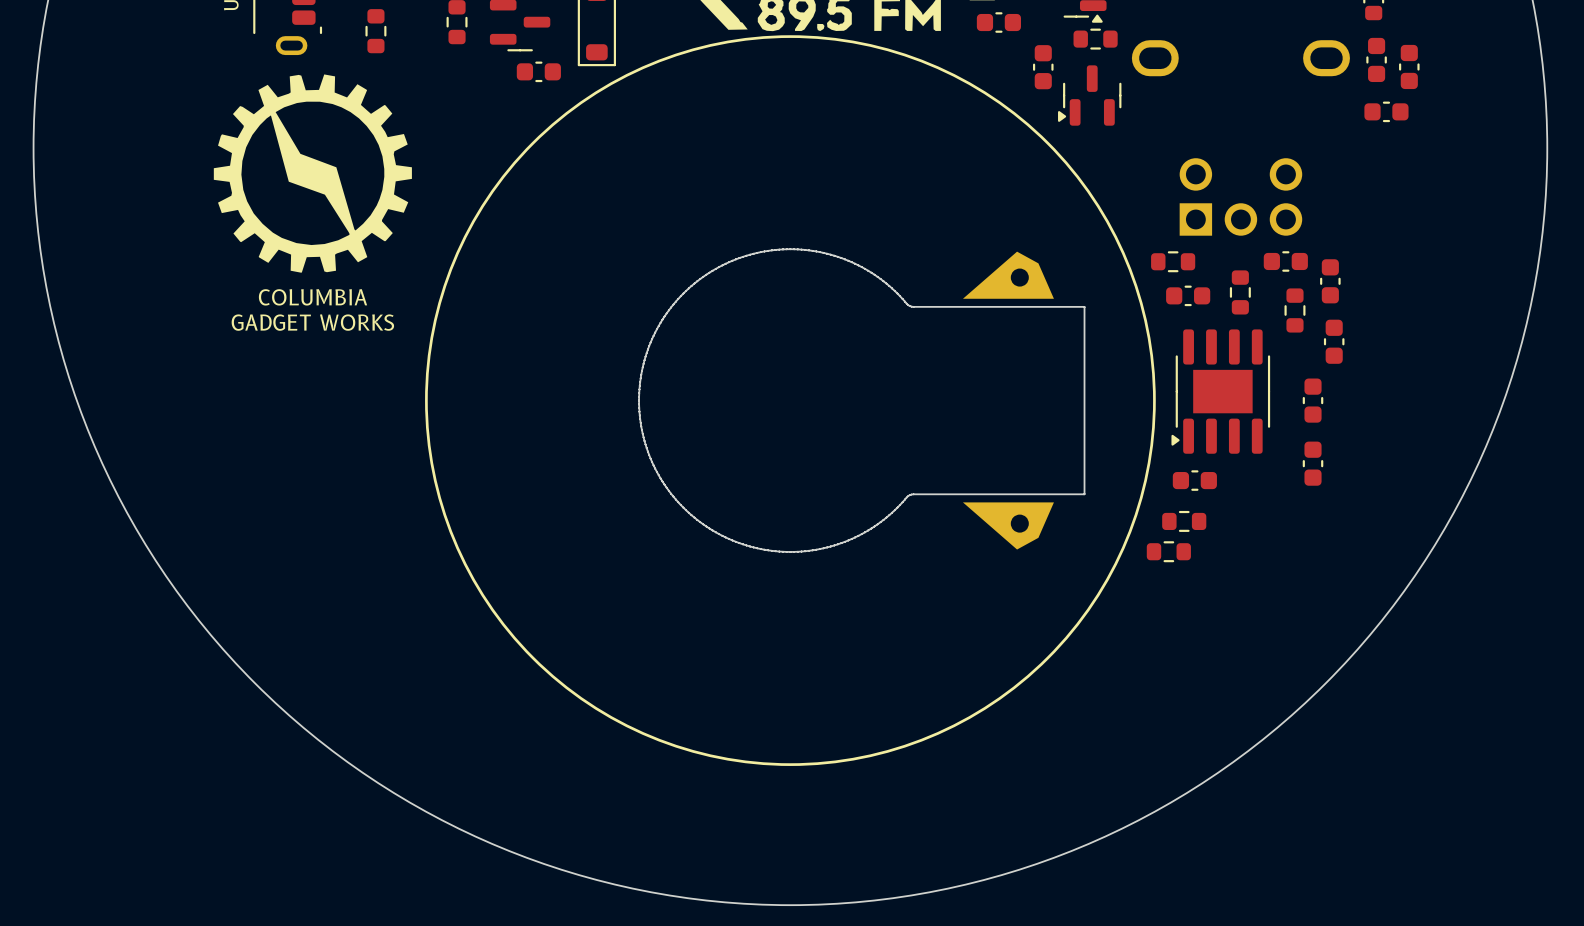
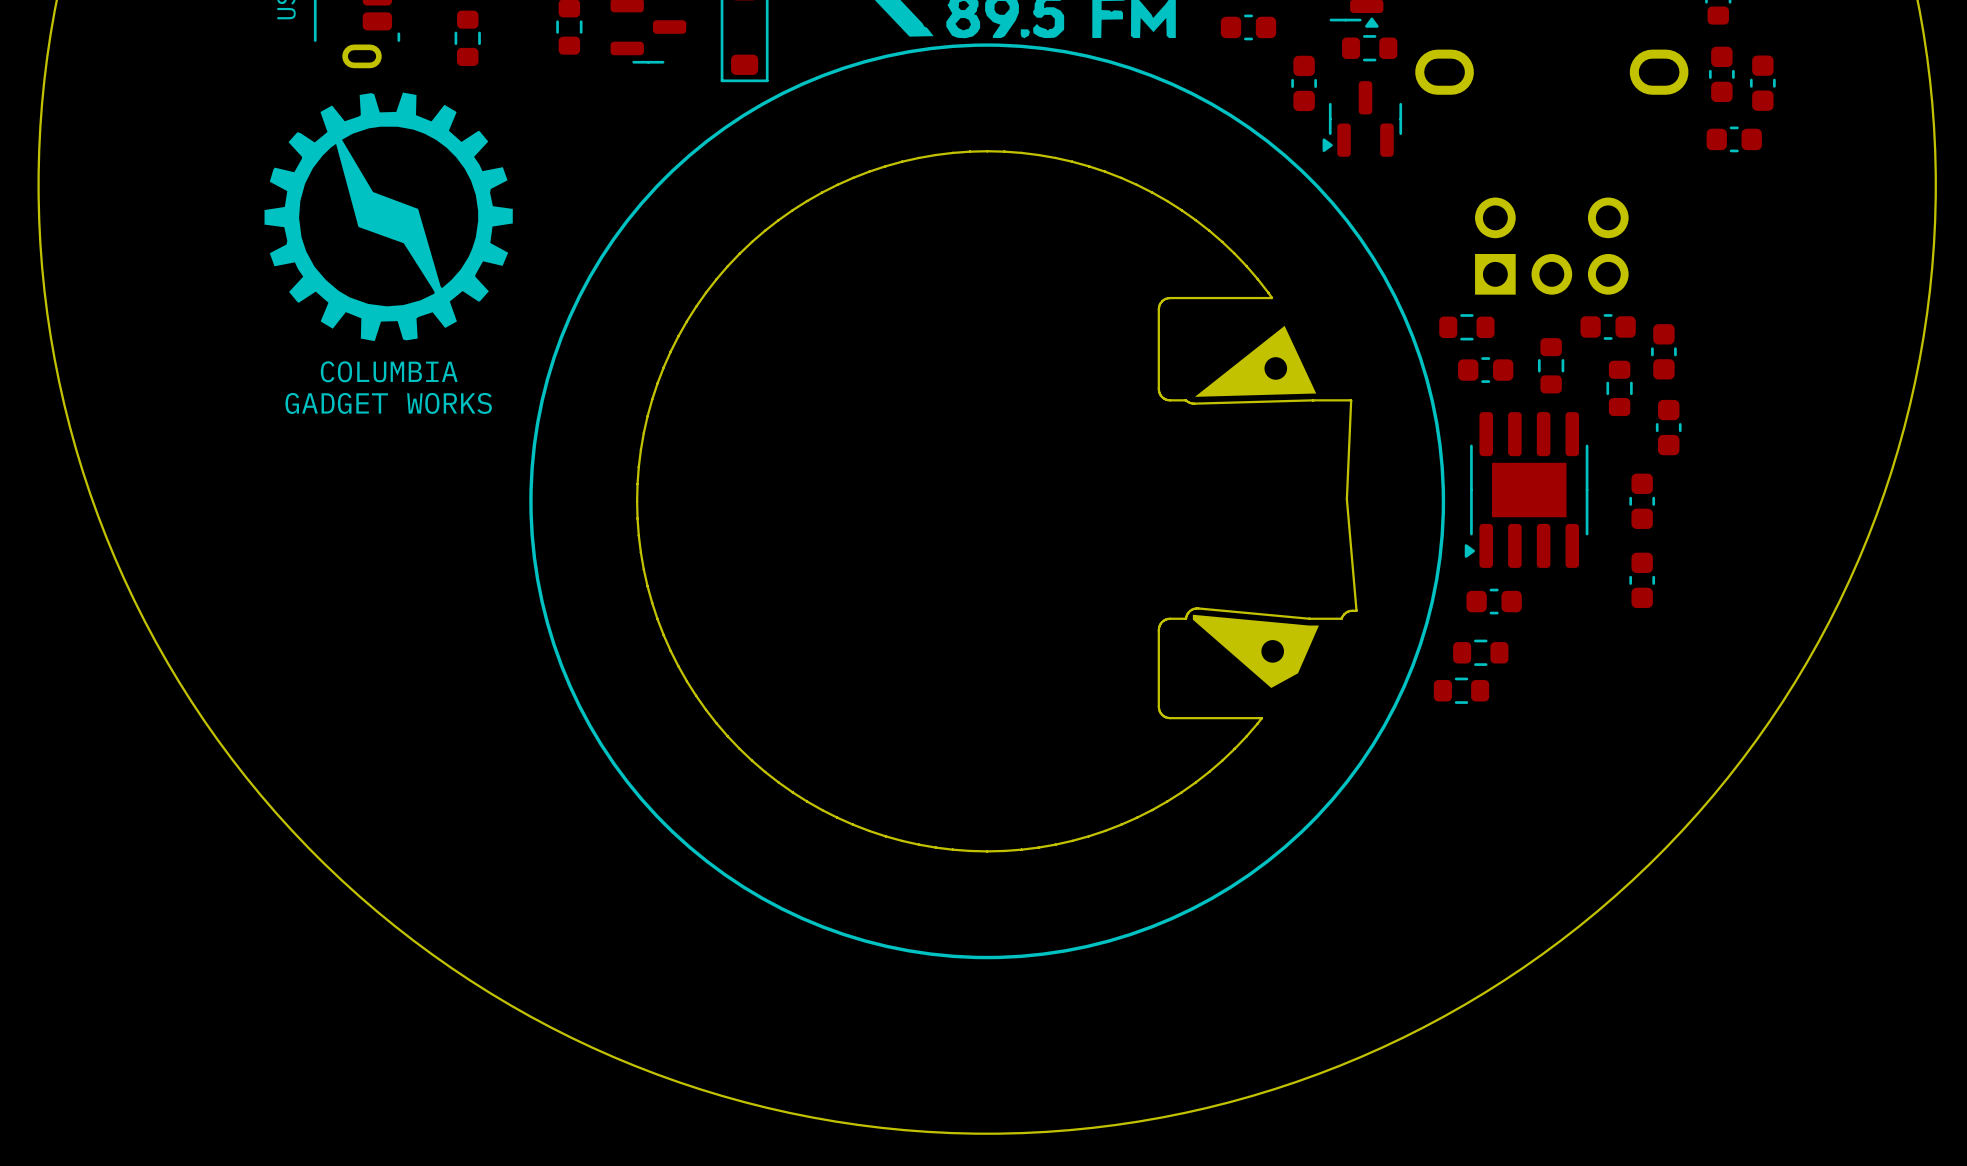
part footprint: [425, 35, 1156, 766] -> [529, 43, 1446, 960]
part: (538, 71) -> none

